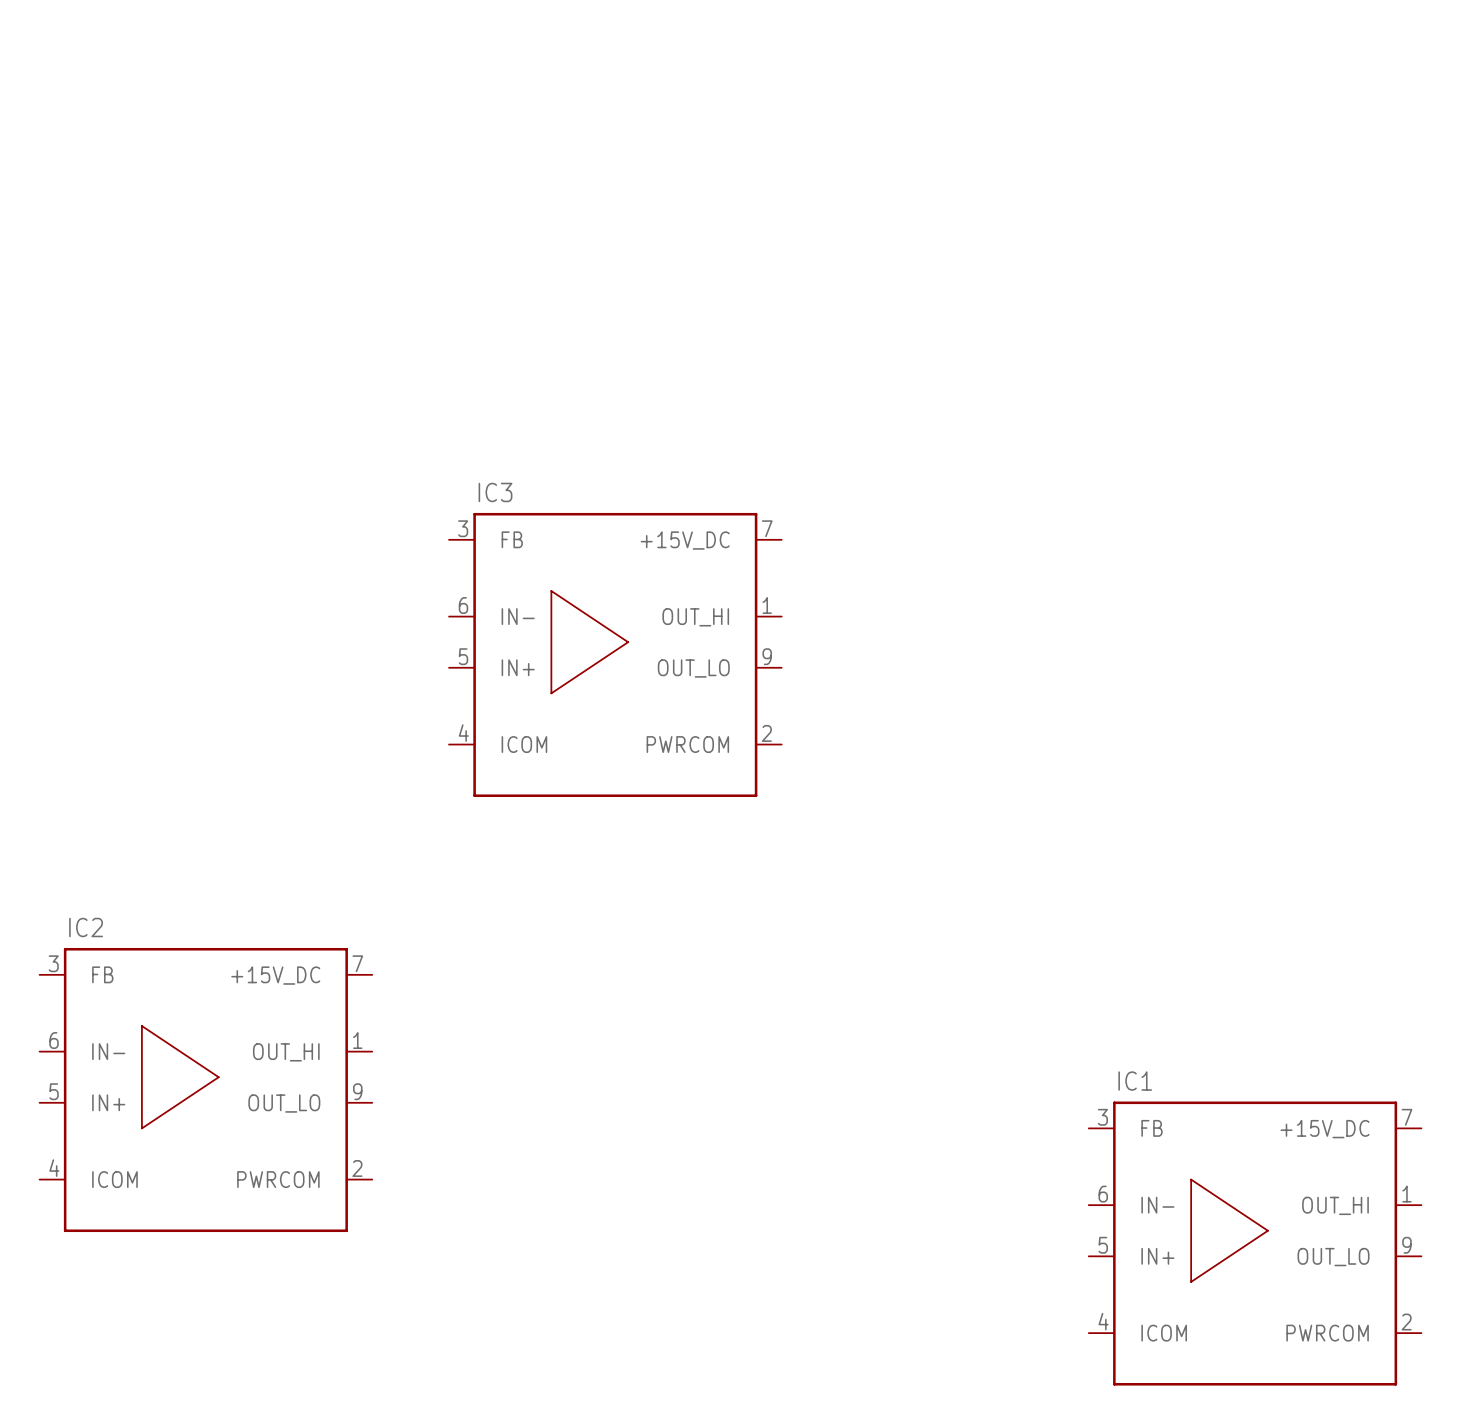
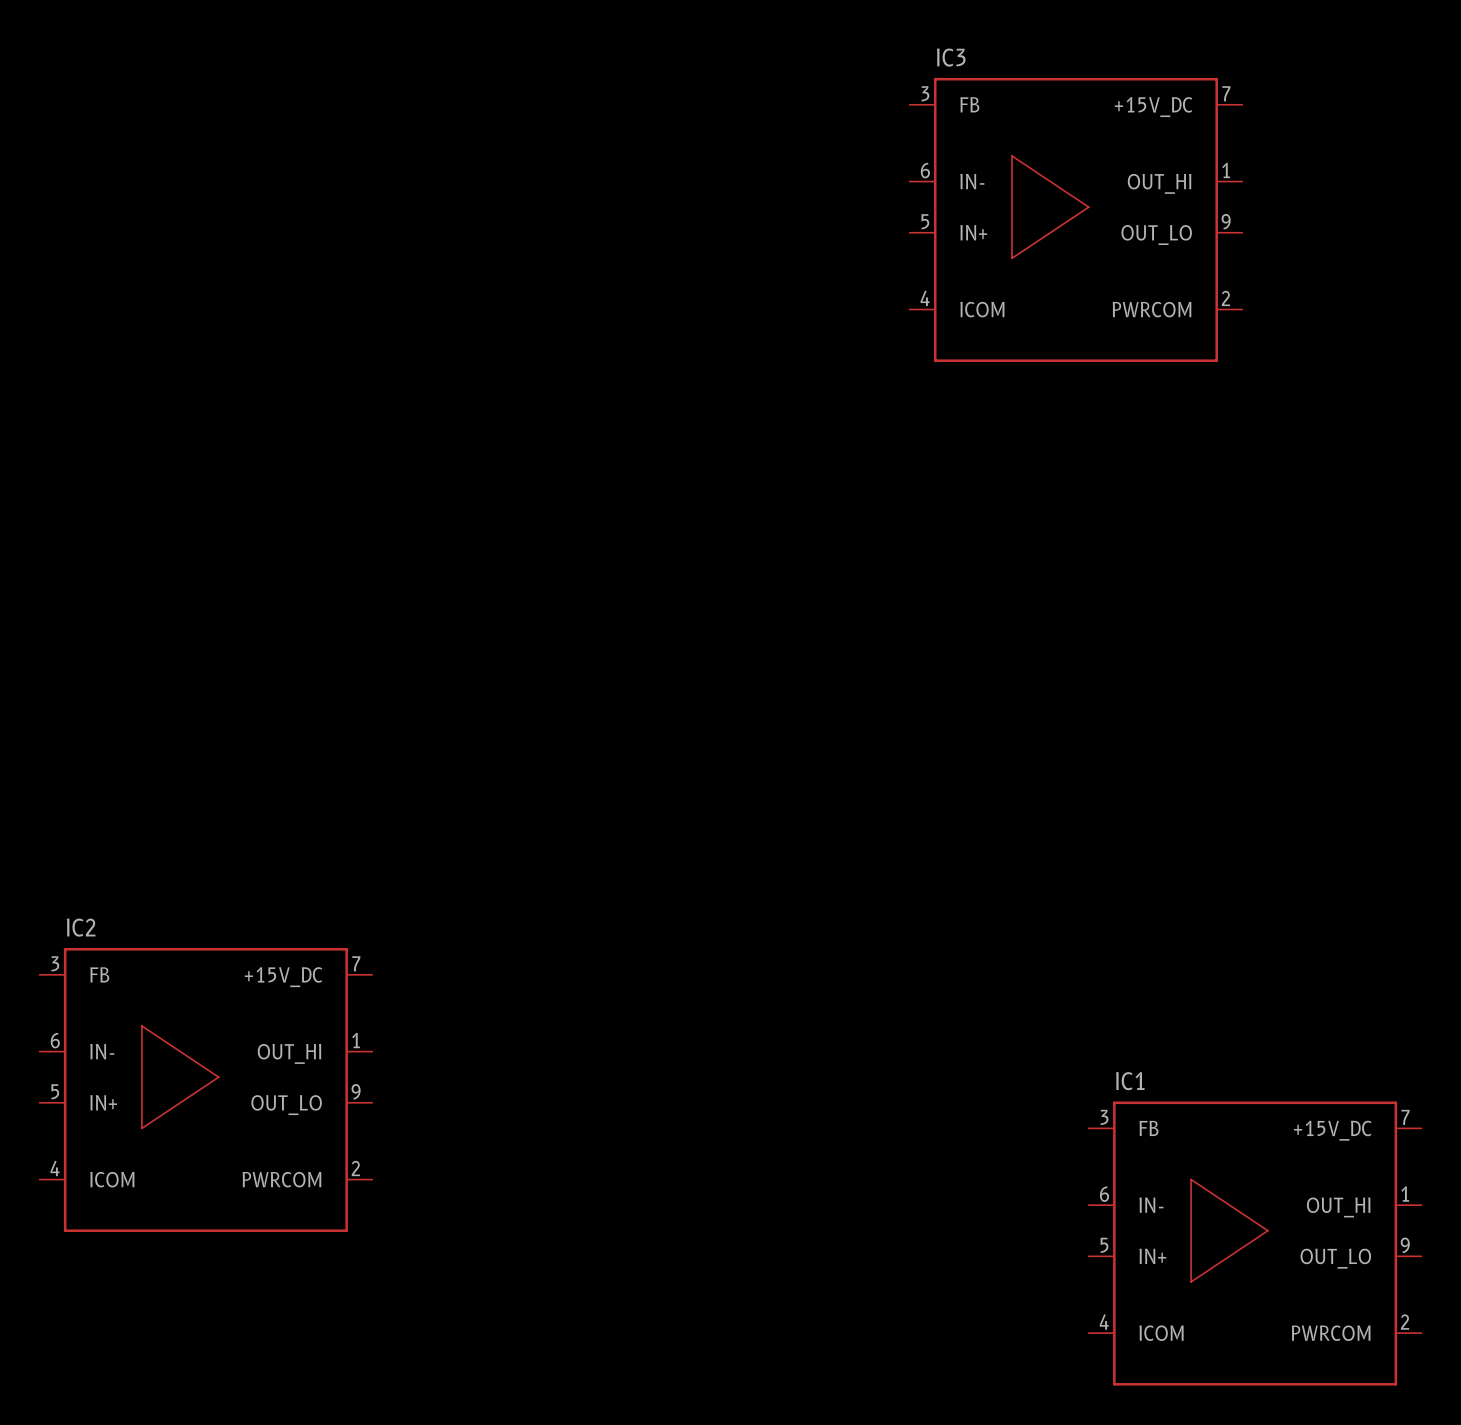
IC3 position: (615, 654) -> (1075, 219)

